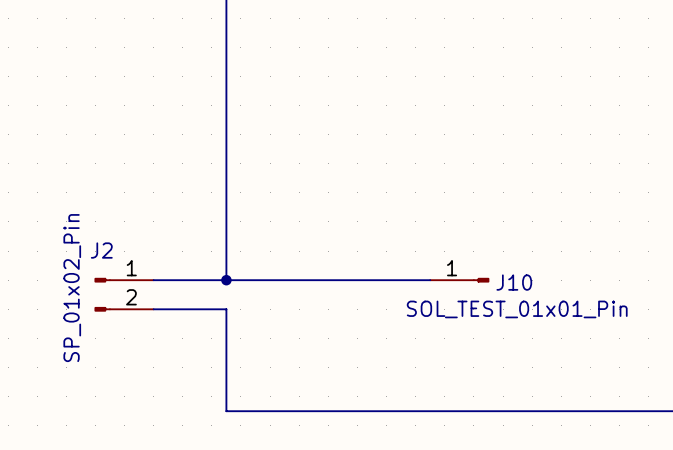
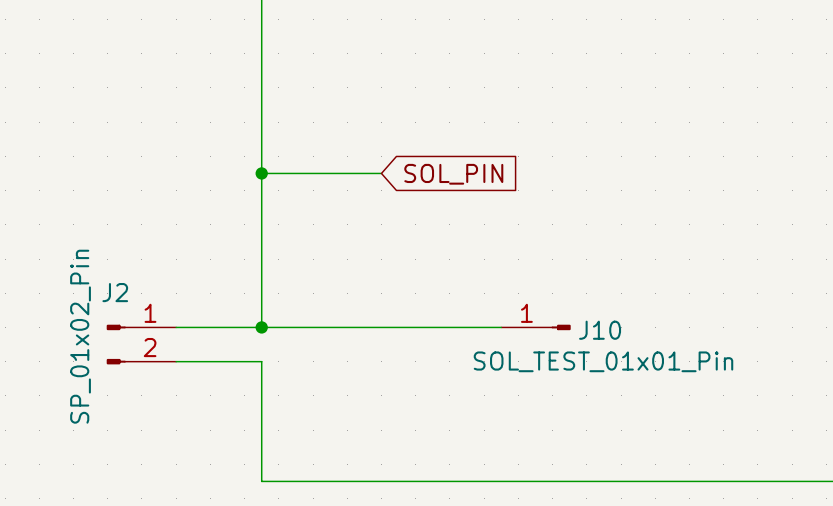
wire: none -> (261, 173) (381, 173)
junction: none -> (261, 173)
global label: none -> SOL_PIN (453, 174)

